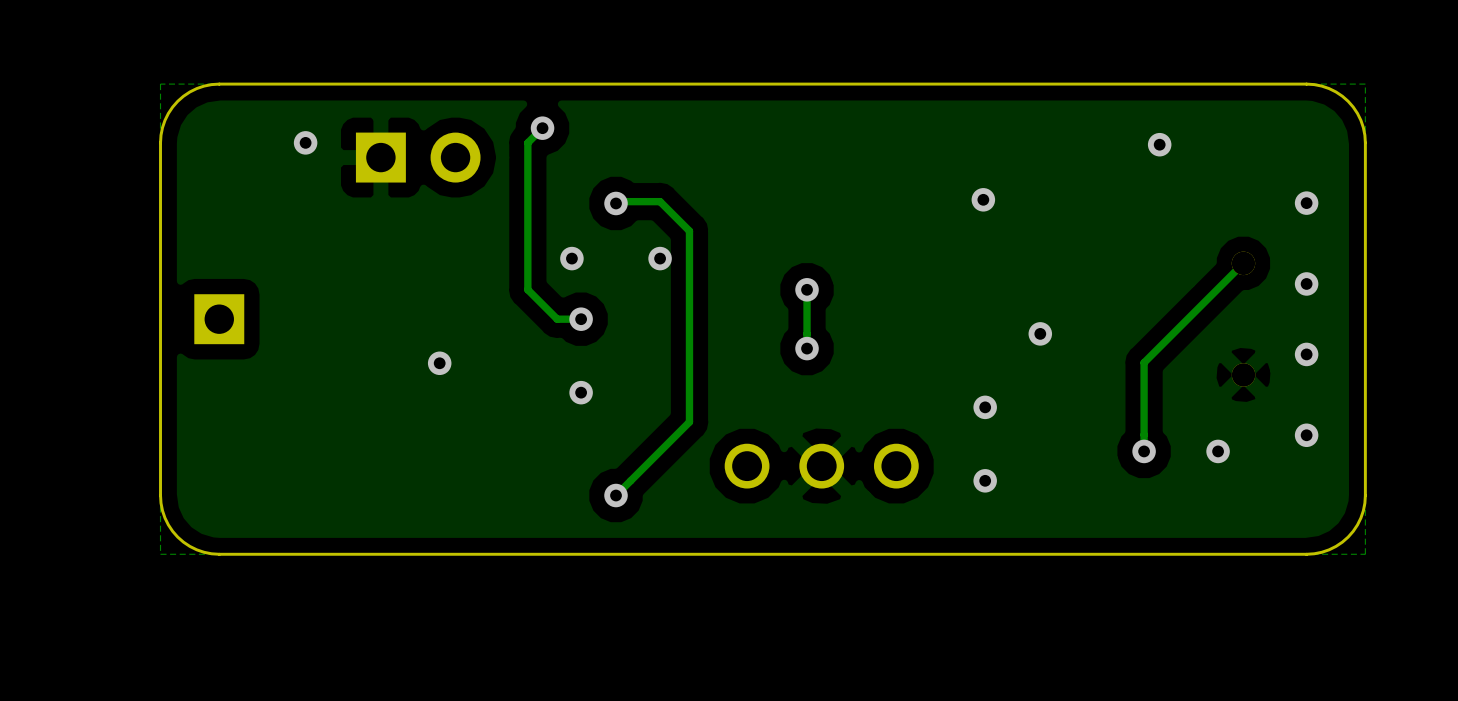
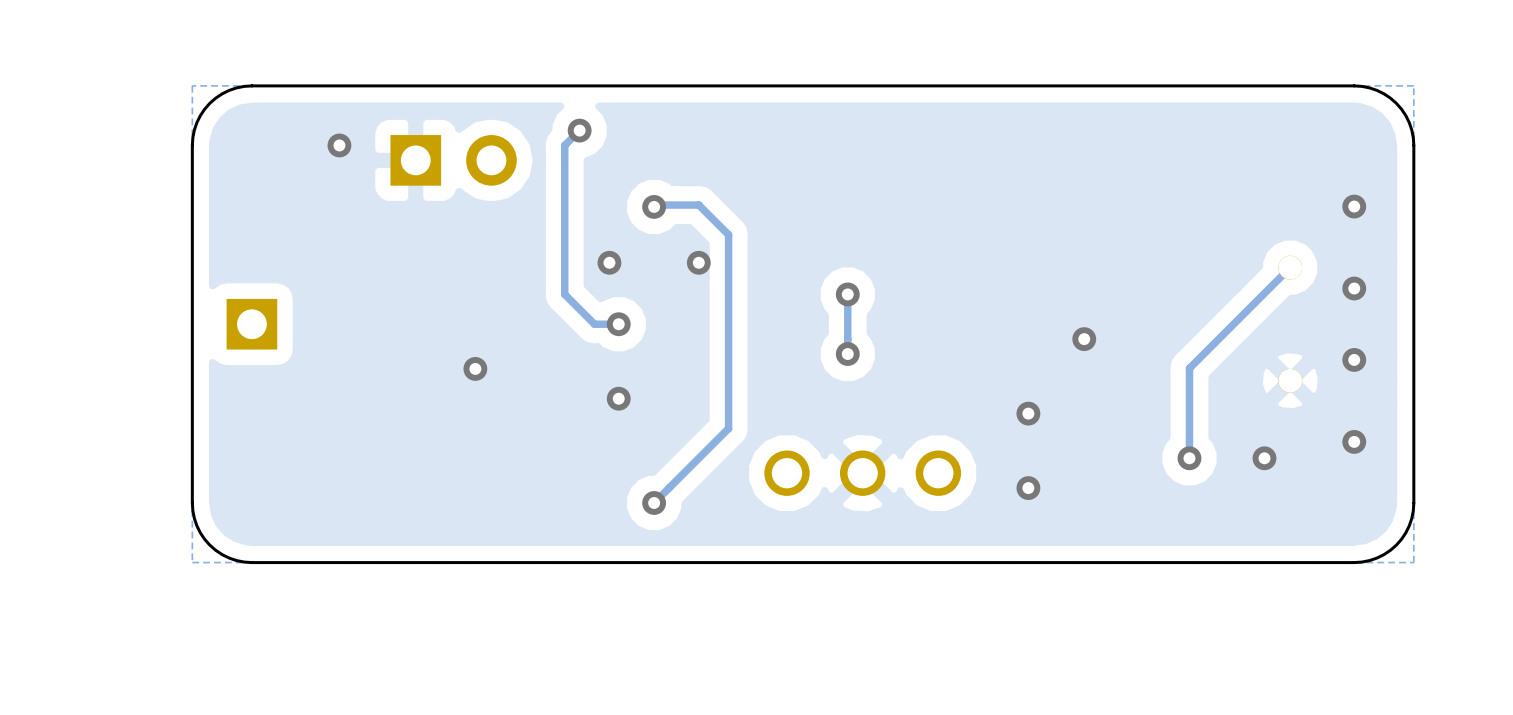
via: (1159, 144) -> none
via: (983, 199) -> none

